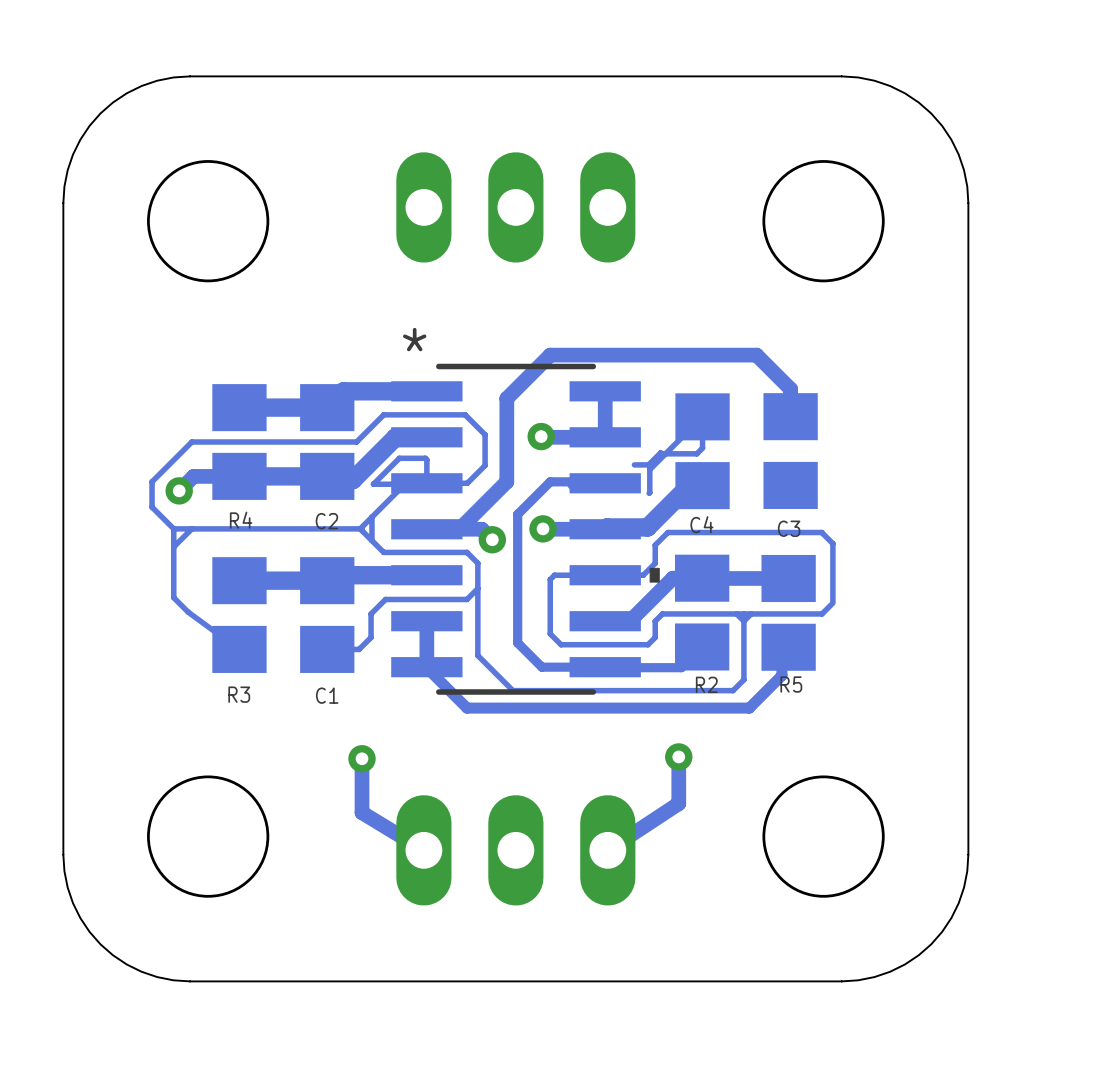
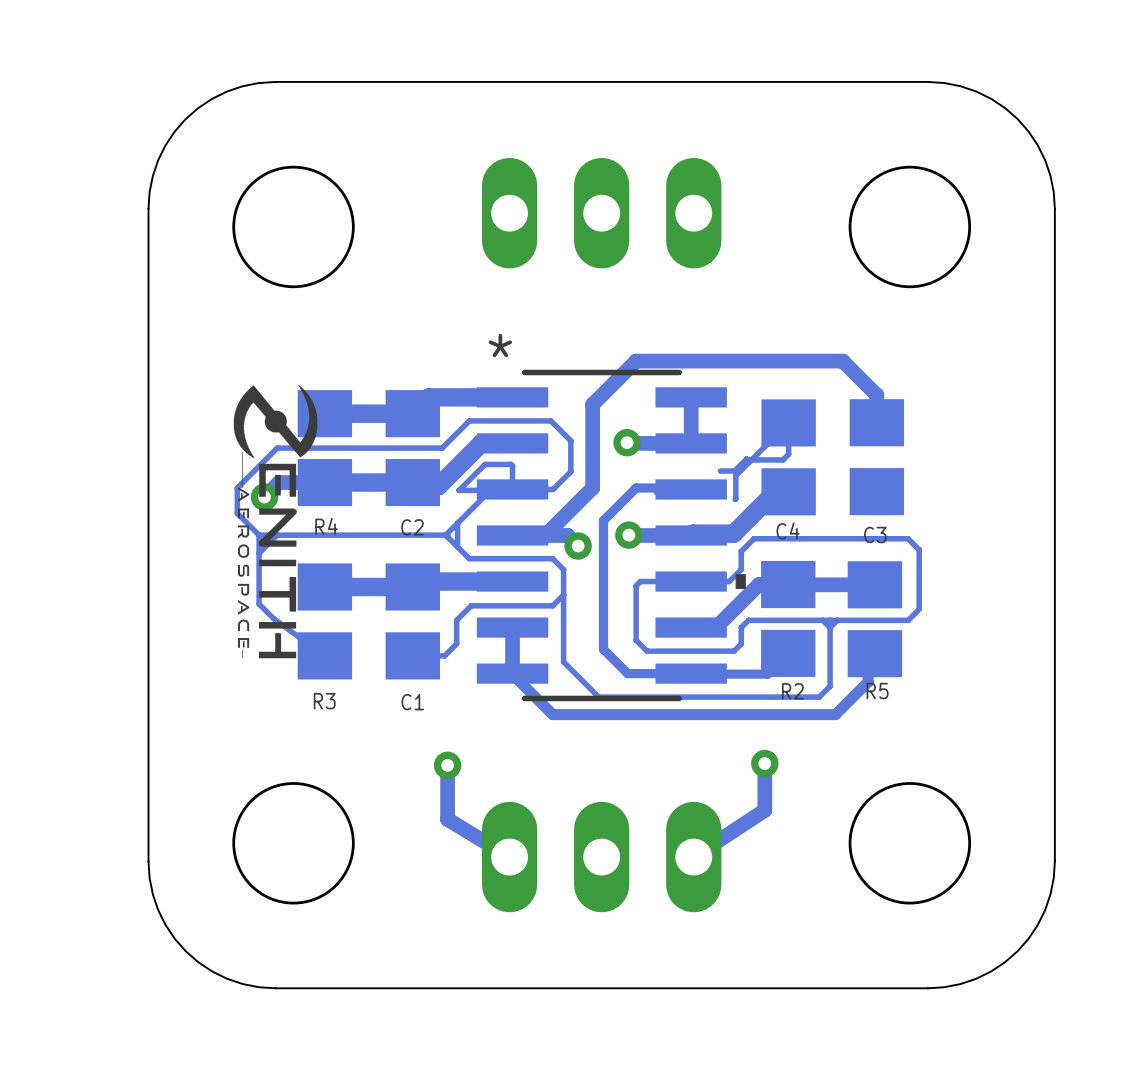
drawing: none -> [233, 384, 318, 659]

